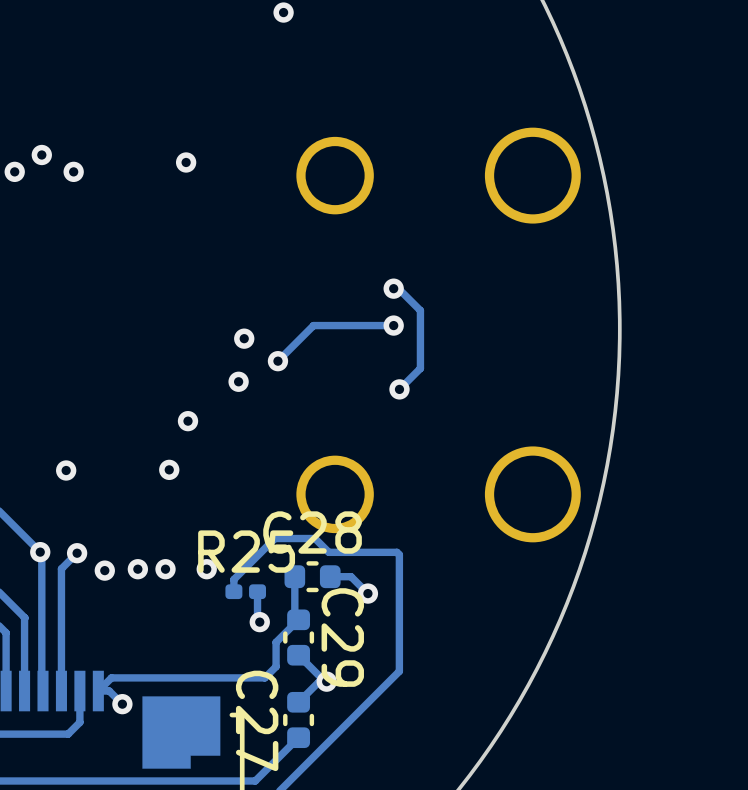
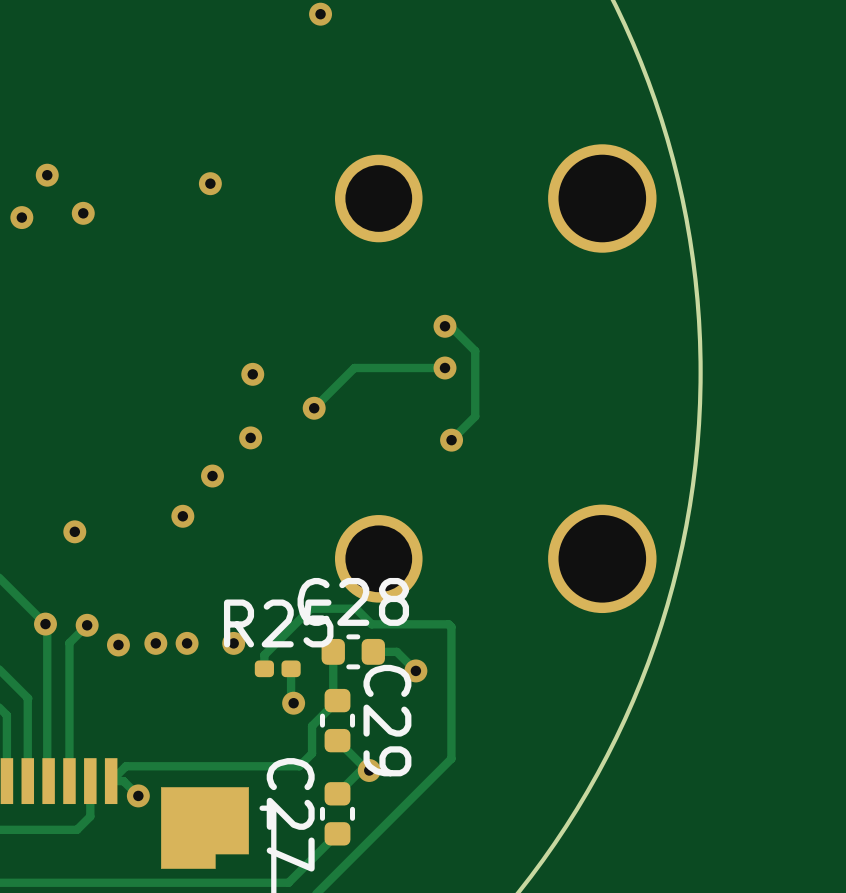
via position: (14, 171) -> (21, 217)
via position: (73, 171) -> (83, 213)
via position: (244, 338) -> (252, 374)
via position: (238, 381) -> (250, 437)
via position: (169, 469) -> (182, 516)

